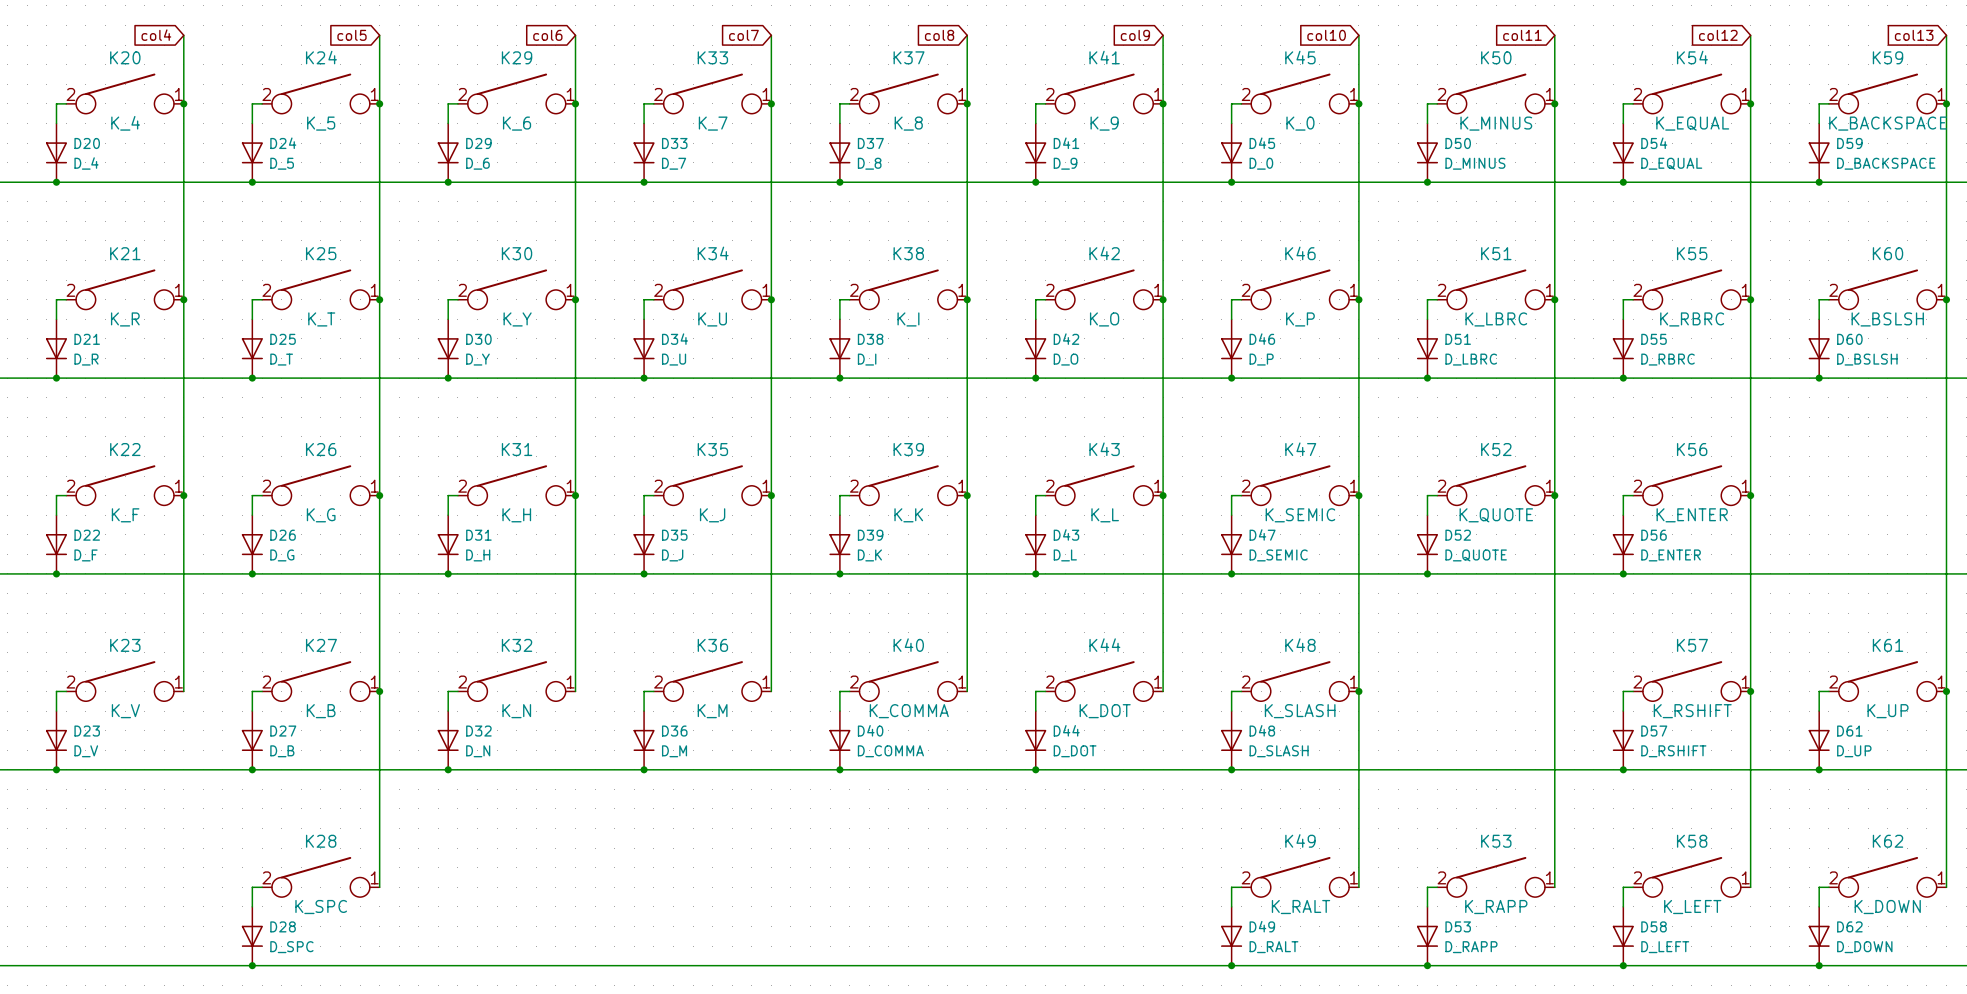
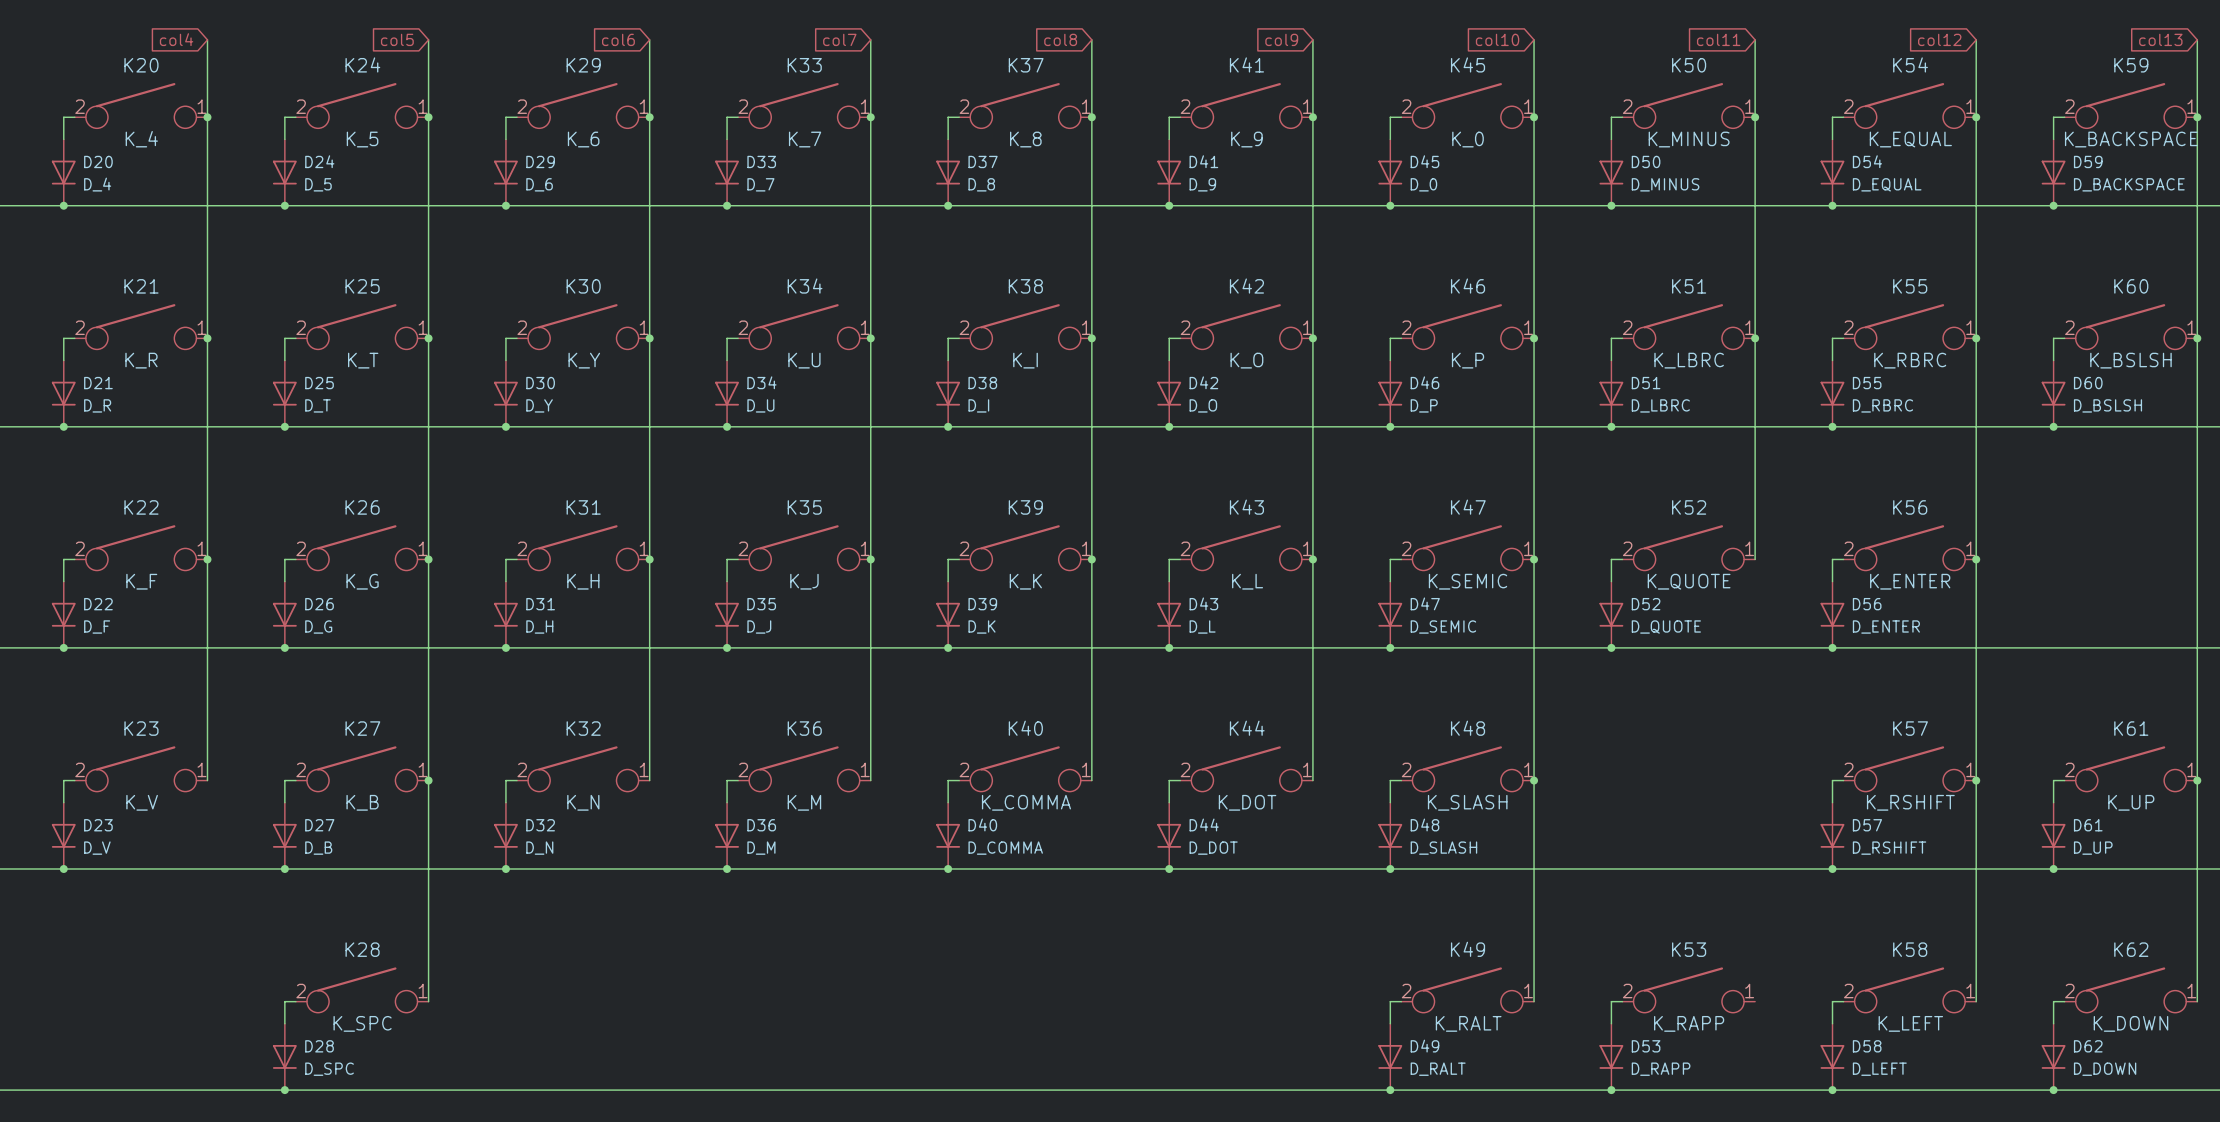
wire: (1554, 495) (1554, 887) -> none
junction: (1554, 495) -> none

